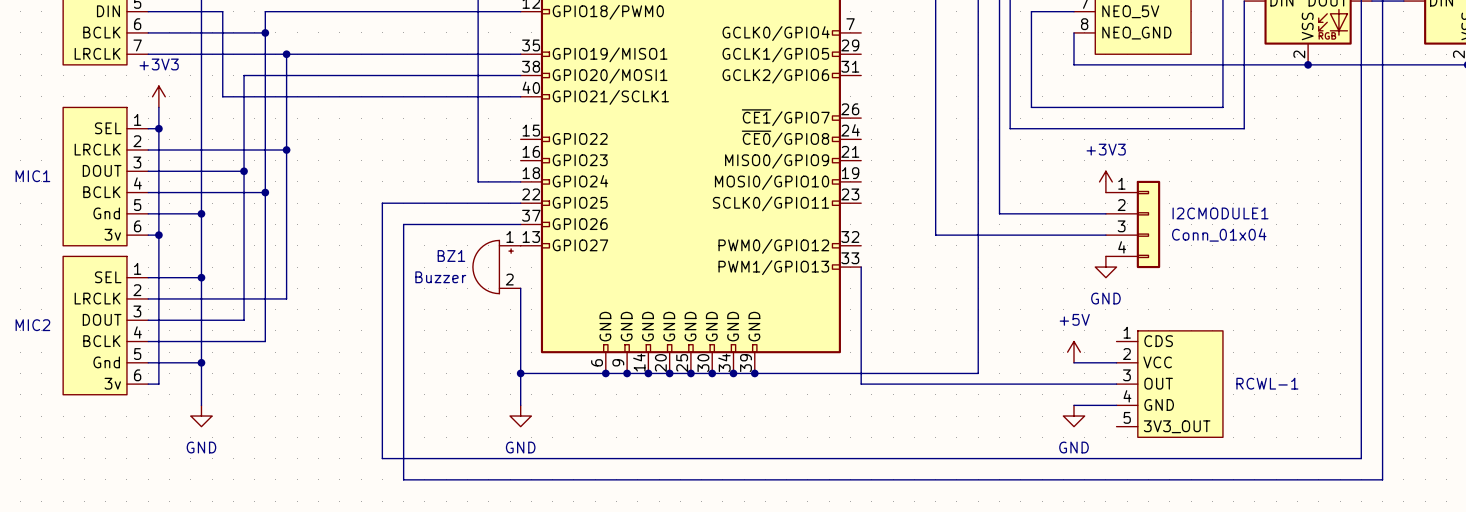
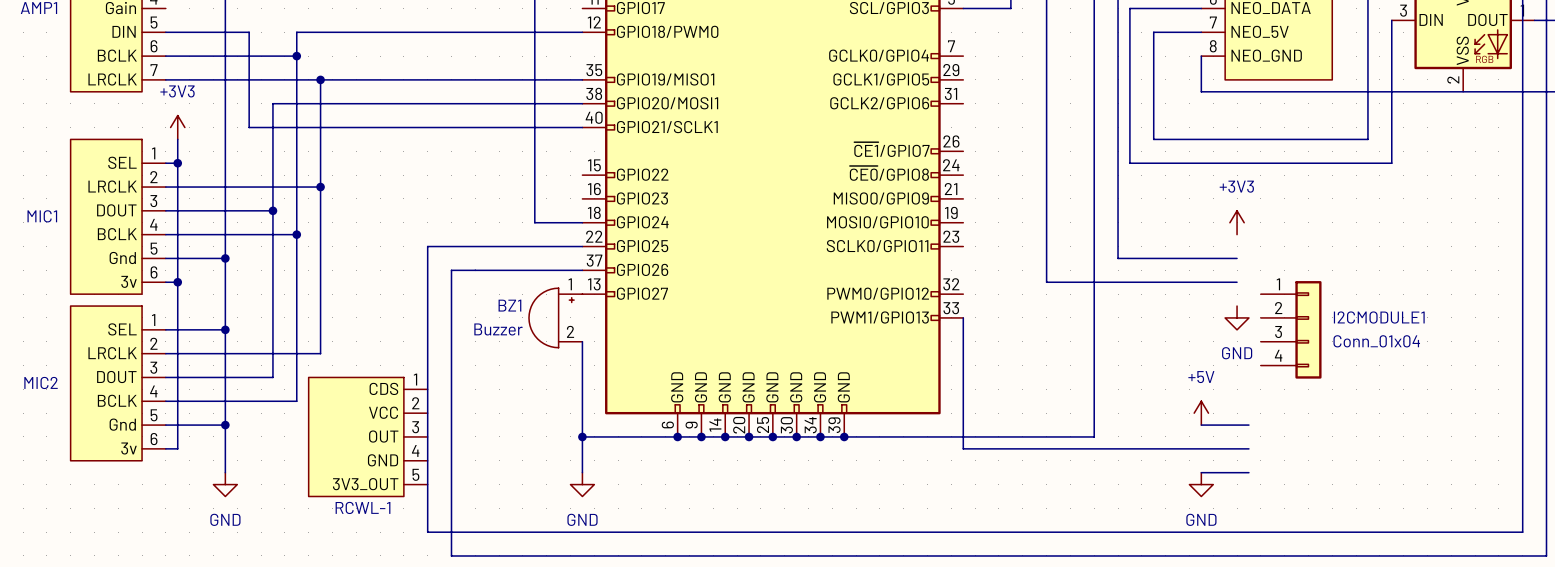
junction: (1308, 64) -> none
I2CMODULE1 position: (1133, 224) -> (1291, 329)
RCWL-1 name position: RCWL-1 (1267, 383) -> RCWL-1 (363, 507)
RCWL-1 position: (1169, 384) -> (368, 436)
RCWL-1 flip: as is (1180, 384) -> left-right (356, 436)

